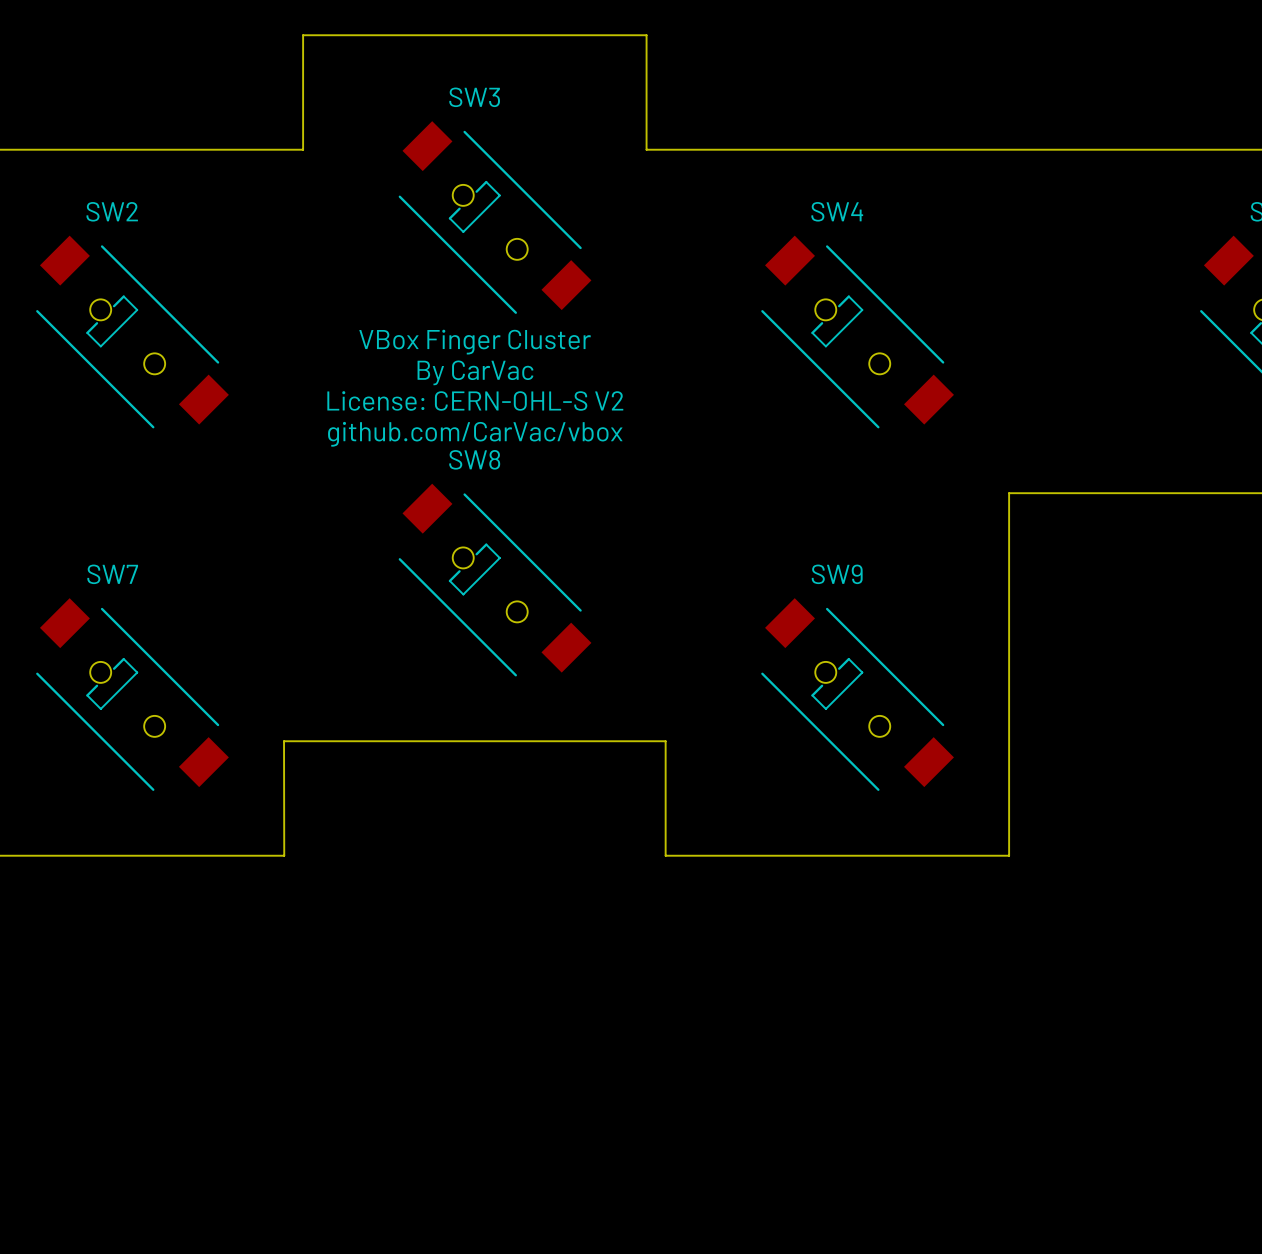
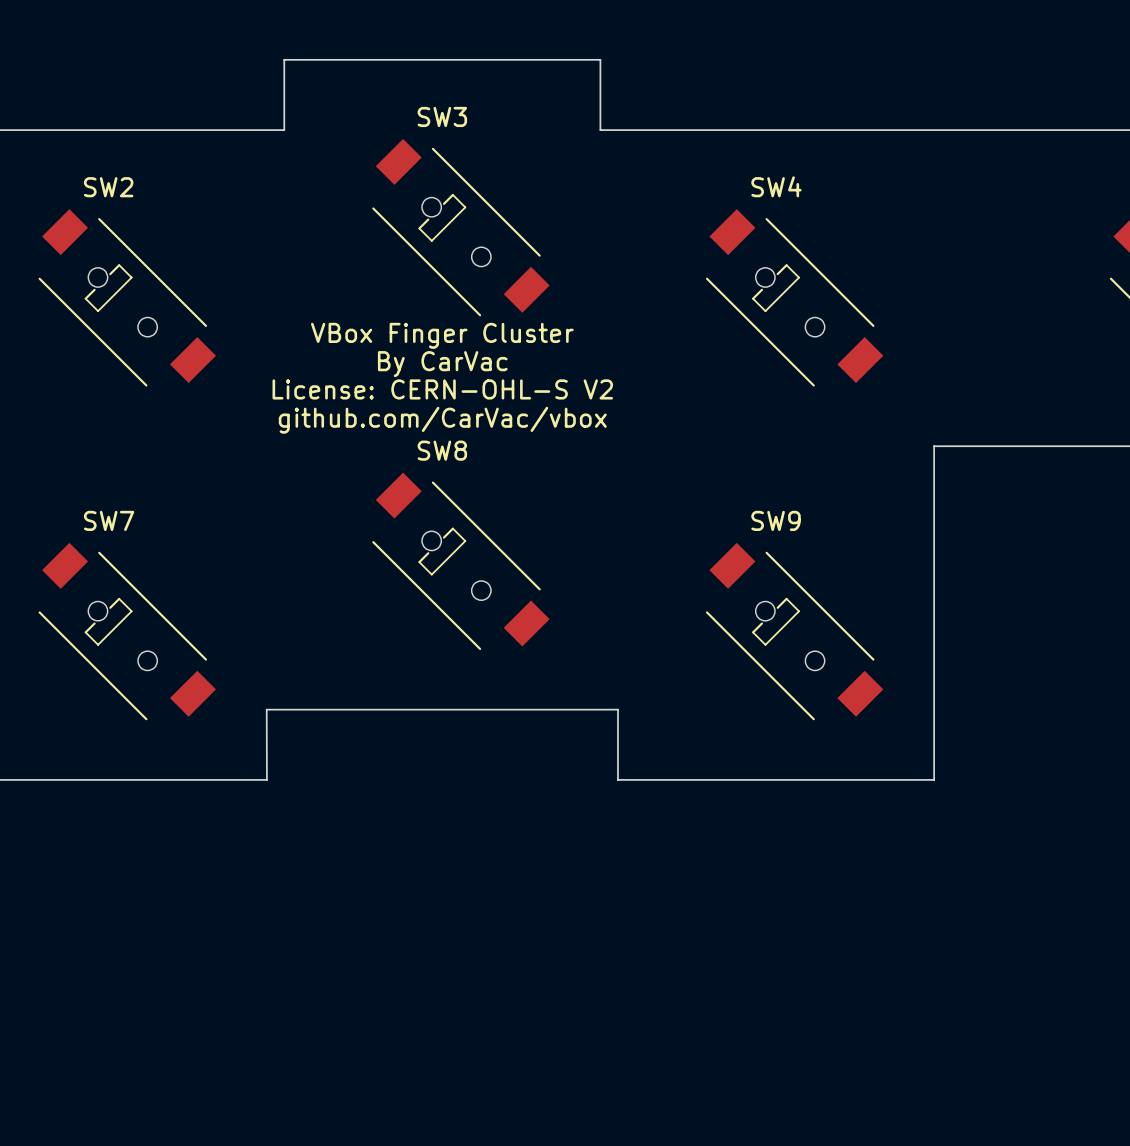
board edge: (303, 73) (303, 35) (646, 35) (646, 73) -> (284, 59) (600, 59)
SW3 position: (495, 217) -> (460, 227)
text: VBox Finger Cluster (475, 342) -> none
text: By CarVac (475, 372) -> VBox Finger Cluster (442, 335)
text: License: CERN-OHL-S V2 (475, 400) -> By CarVac (442, 364)
text: github.com/CarVac/vbox (475, 434) -> License: CERN-OHL-S V2 (442, 389)
text: none -> github.com/CarVac/vbox (442, 420)
SW8 position: (495, 580) -> (460, 561)
board edge: (665, 779) (665, 741) (284, 741) (284, 855) -> (617, 709) (266, 709) (266, 779)

